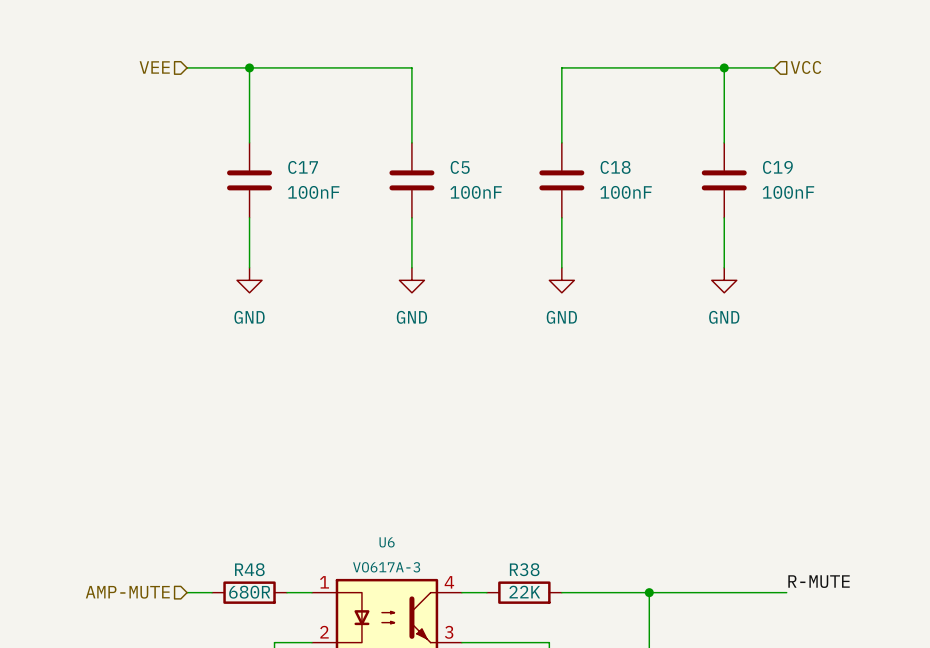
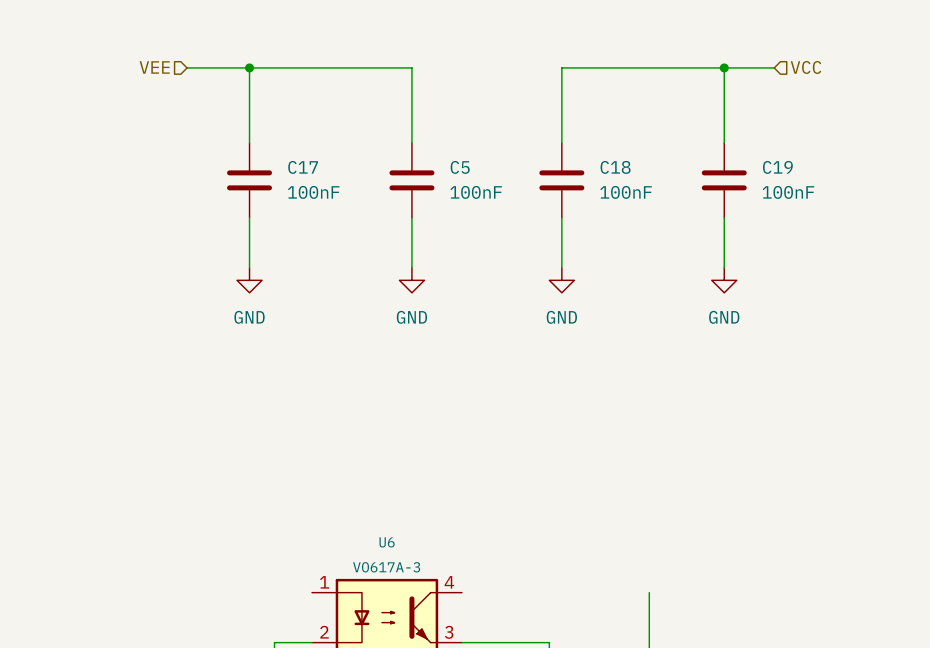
label: R-MUTE (819, 581) -> none
hierarchical label: AMP-MUTE (127, 592) -> none
wire: (187, 592) (212, 592) -> none
R48: 680R (249, 592) -> none
wire: (287, 592) (311, 592) -> none
wire: (461, 592) (486, 592) -> none
R38: 22K (524, 592) -> none
wire: (561, 592) (786, 592) -> none
junction: (649, 592) -> none

